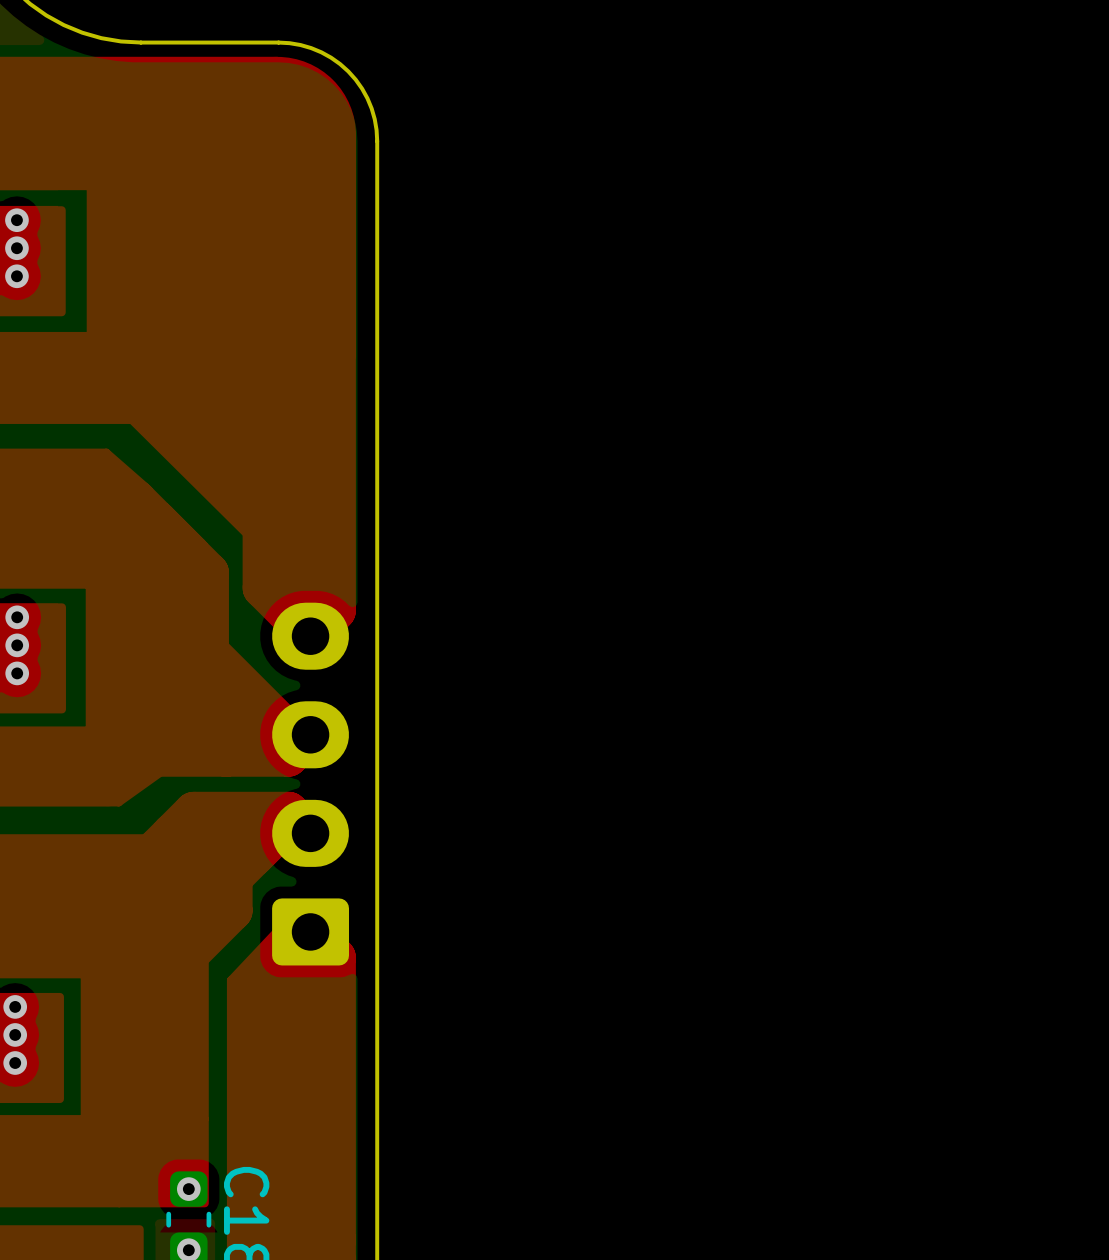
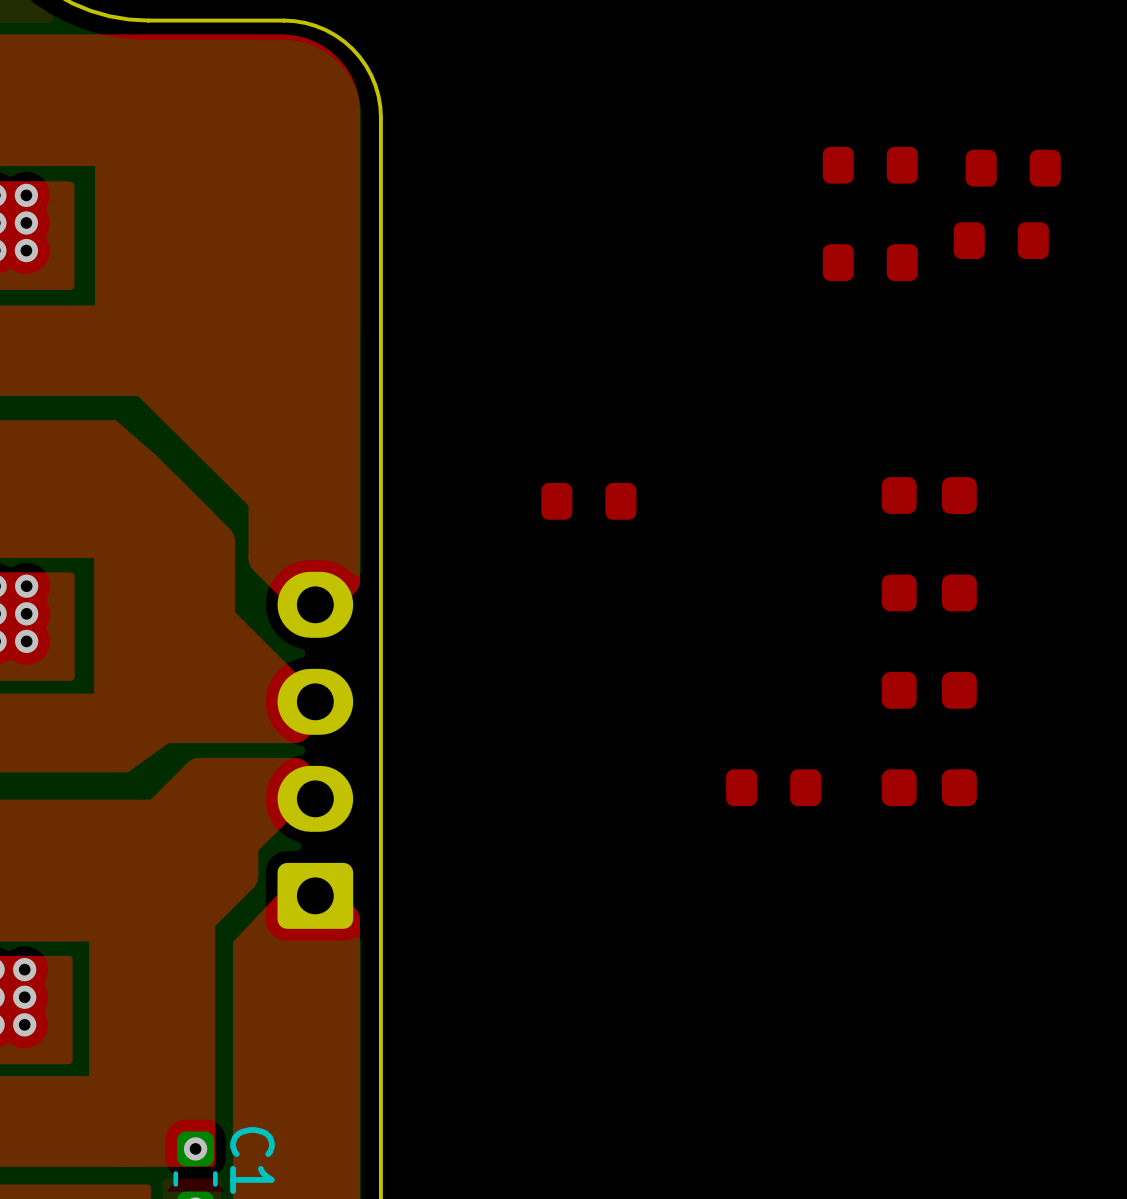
part: none -> (870, 165)
part: none -> (1013, 168)
part: none -> (1001, 240)
part: none -> (870, 262)
part: none -> (929, 495)
part: none -> (588, 501)
part: none -> (929, 592)
part: none -> (929, 690)
part: none -> (773, 787)
part: none -> (929, 787)

